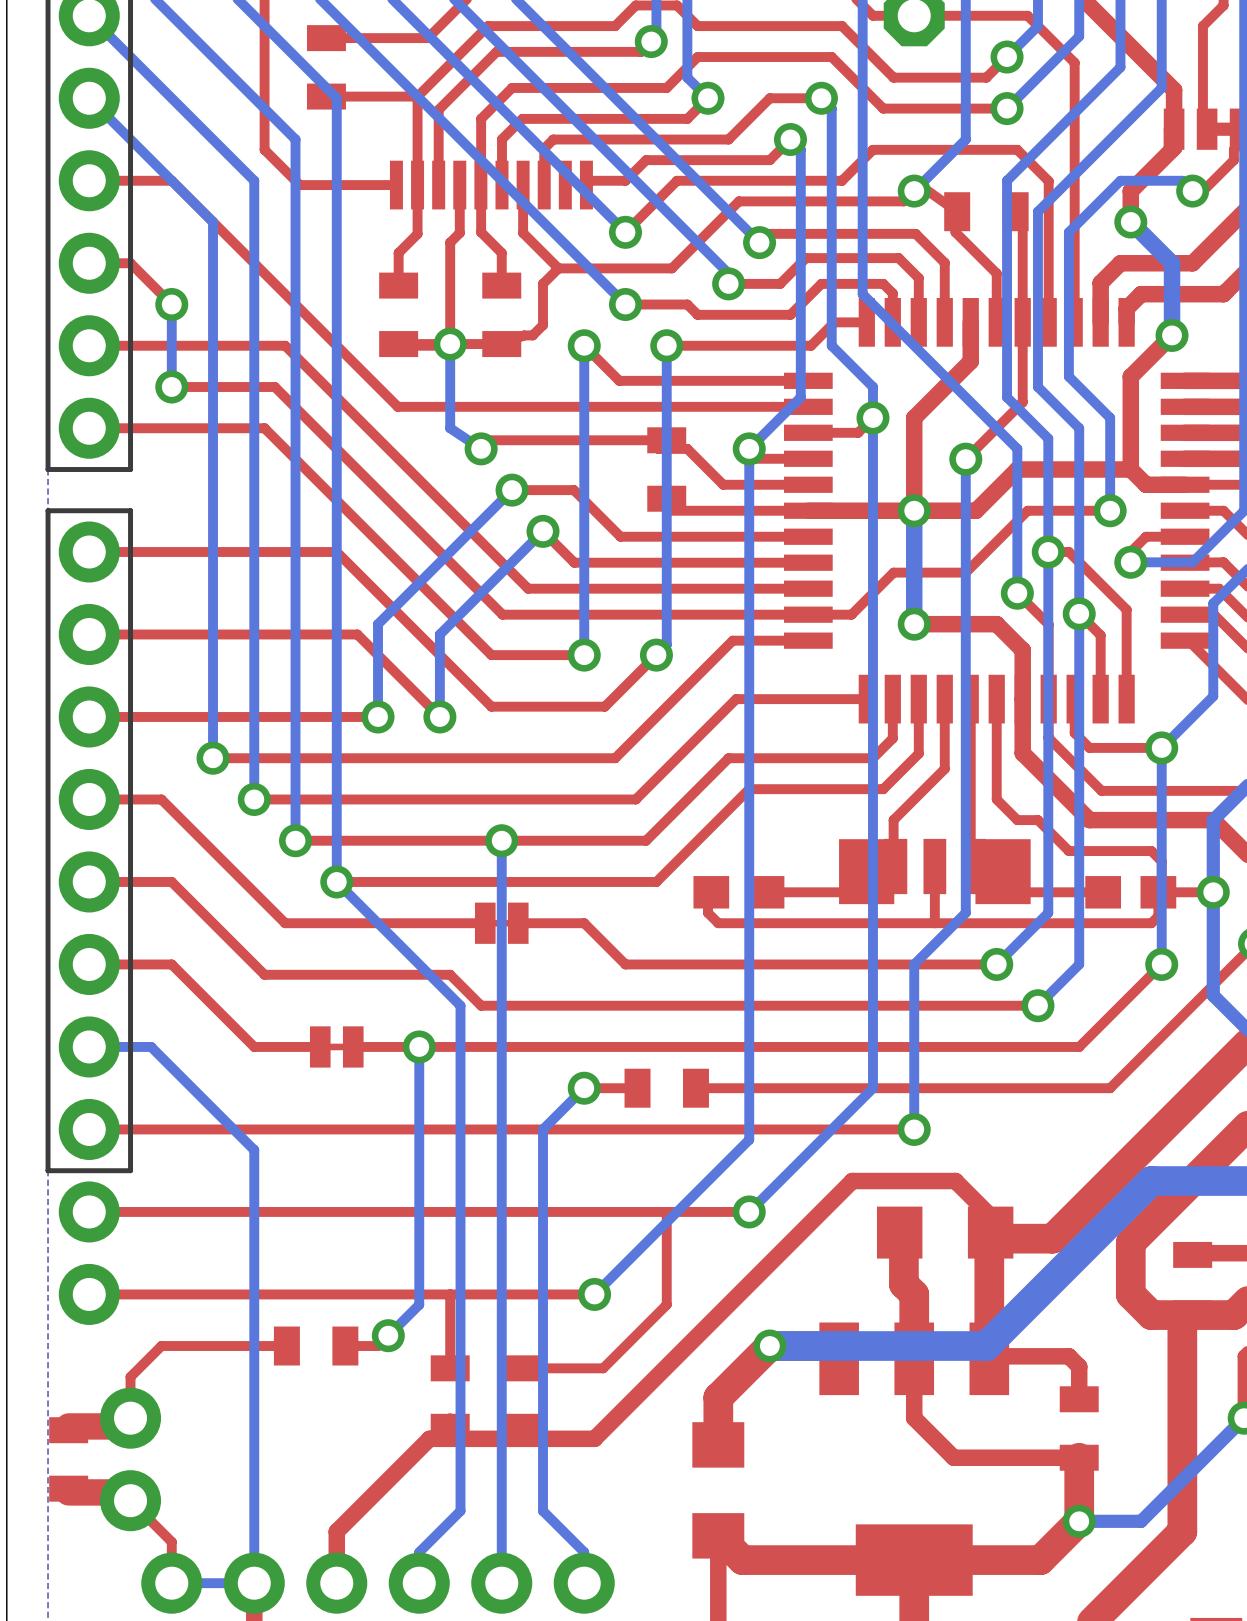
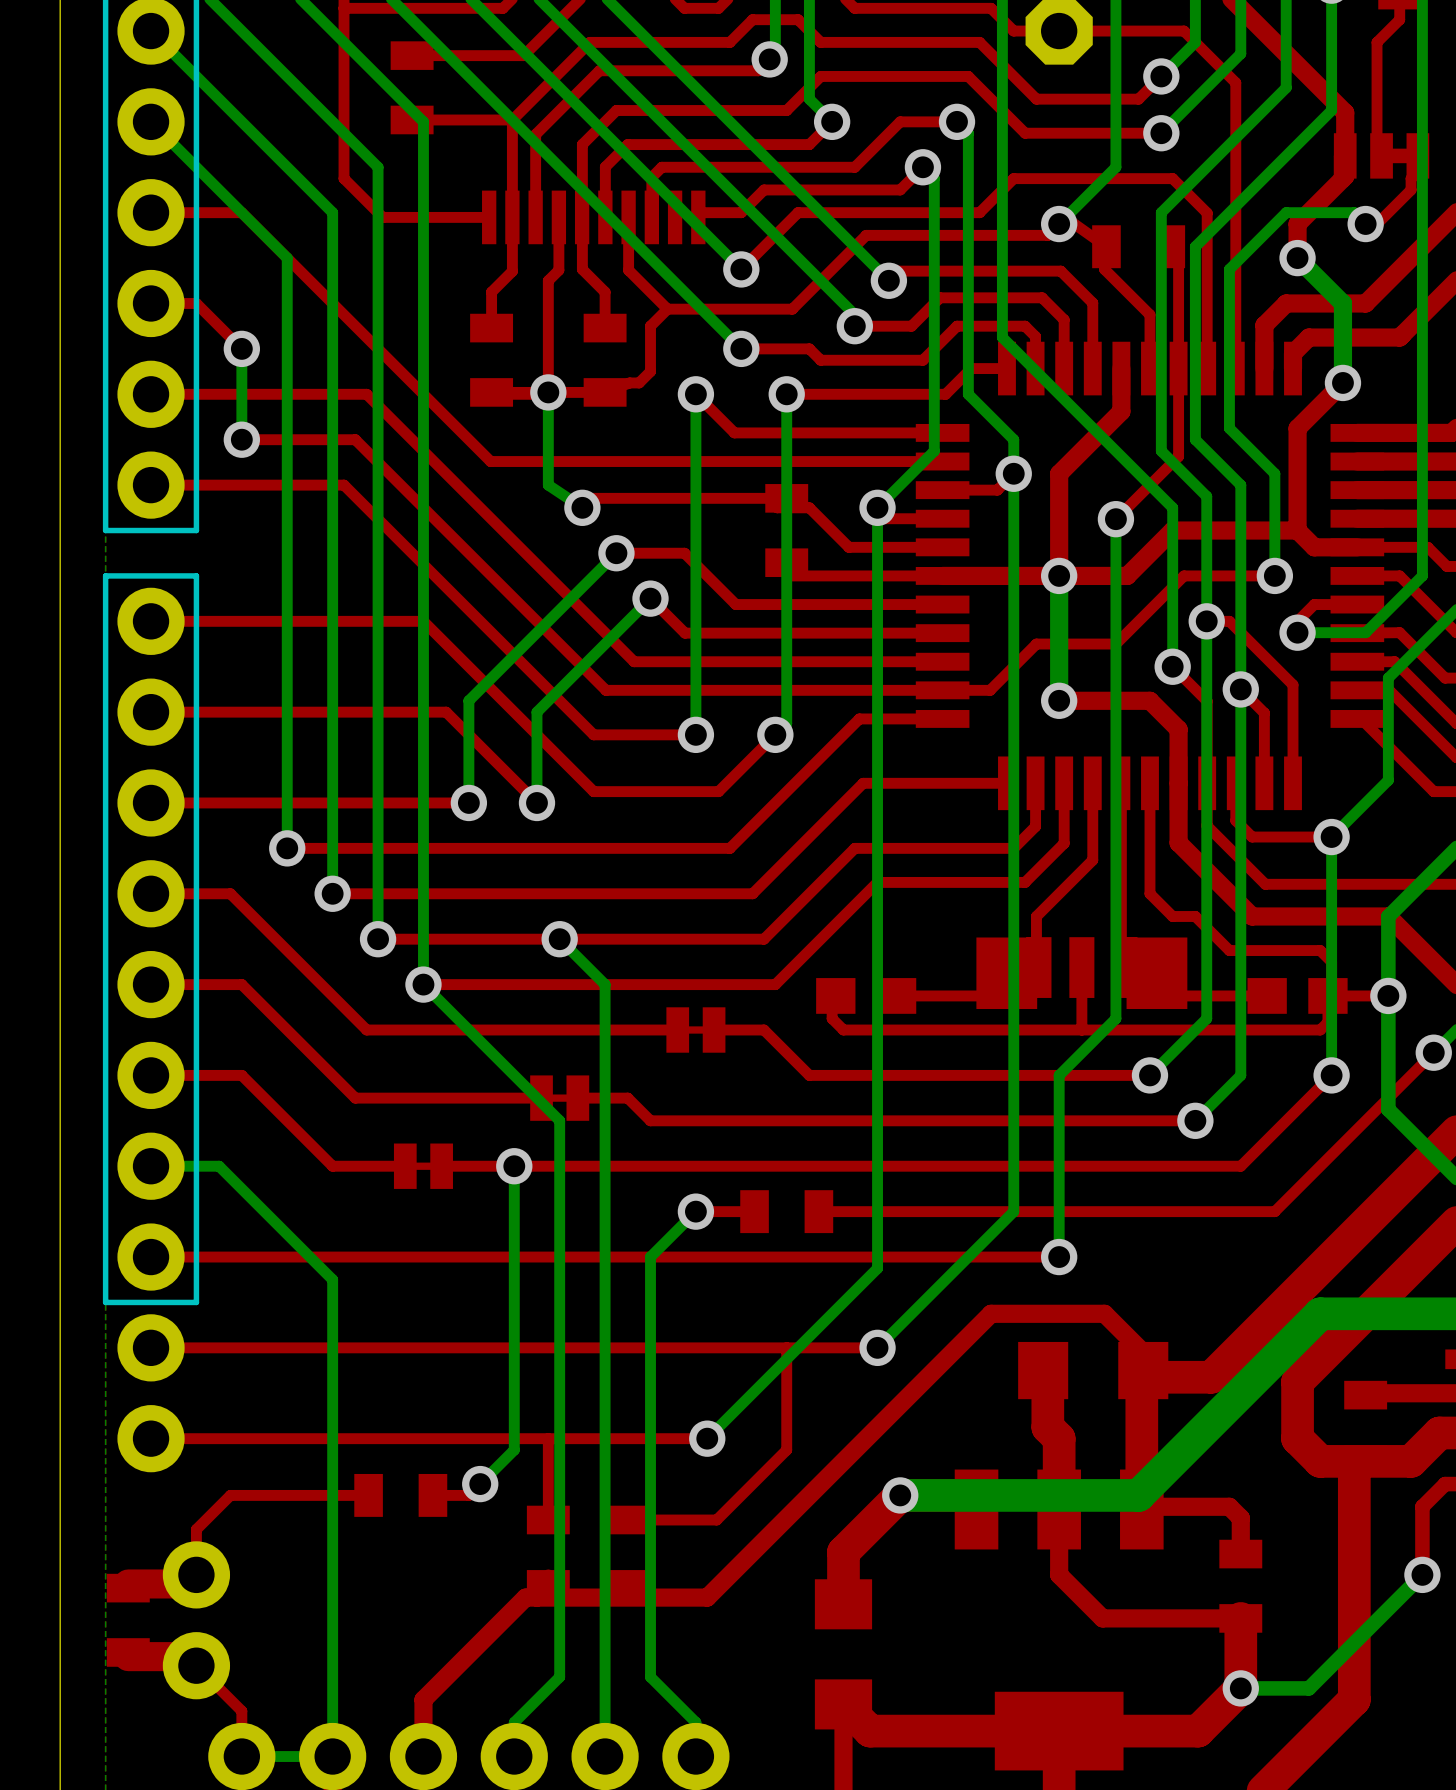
bottom track: (501, 840) (501, 881) -> (559, 939) (605, 984)
via position: (501, 840) -> (559, 939)
part: (501, 923) -> none
top track: none -> (623, 1030) (586, 1030)
top track: (567, 923) (584, 923) (625, 964) (687, 964) -> (714, 1030) (764, 1030) (809, 1075)
part: none -> (695, 1030)
top track: (264, 974) (450, 974) (481, 1005) (543, 1005) -> (344, 1086) (355, 1098) (541, 1098)
part: none -> (559, 1098)
top track: none -> (577, 1098) (627, 1098) (650, 1120)

